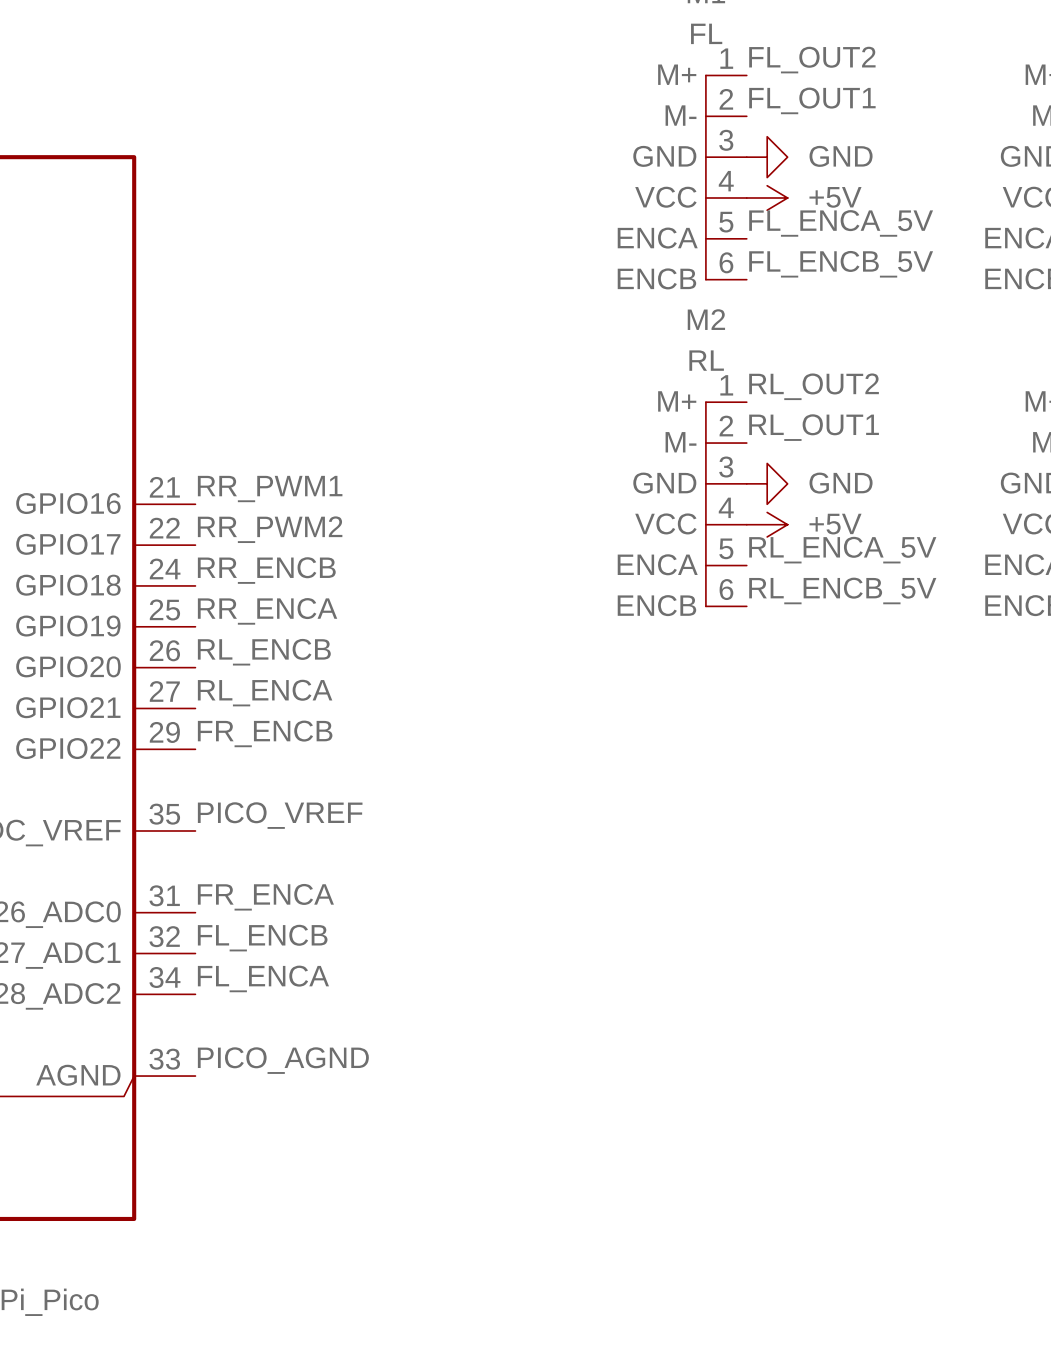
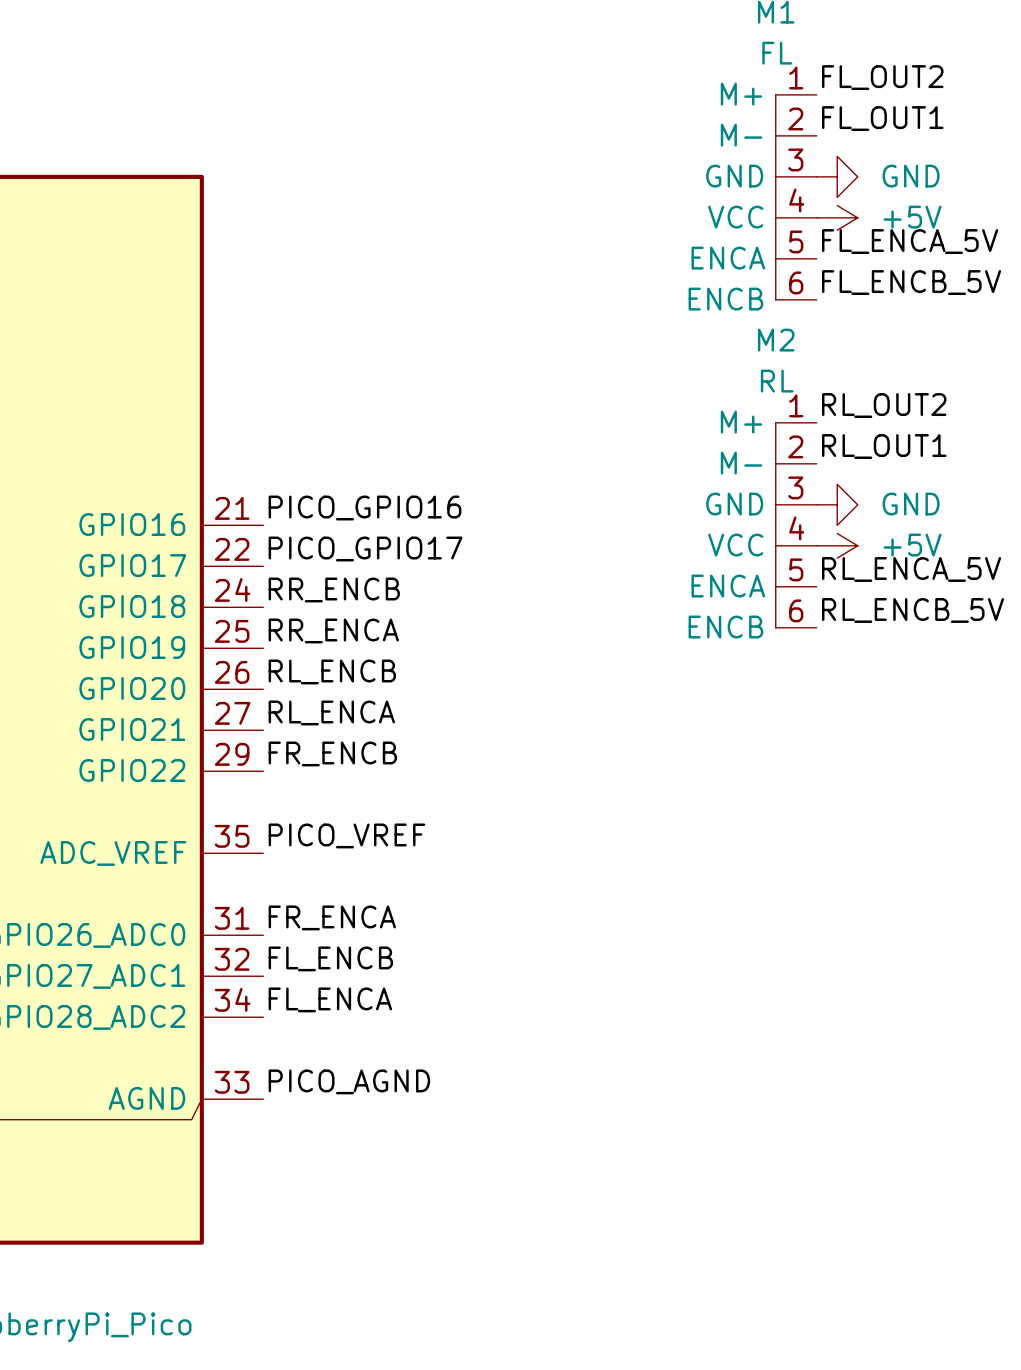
label: RR_PWM1 (270, 489) -> PICO_GPIO16 (365, 508)
label: RR_PWM2 (270, 529) -> PICO_GPIO17 (365, 548)

